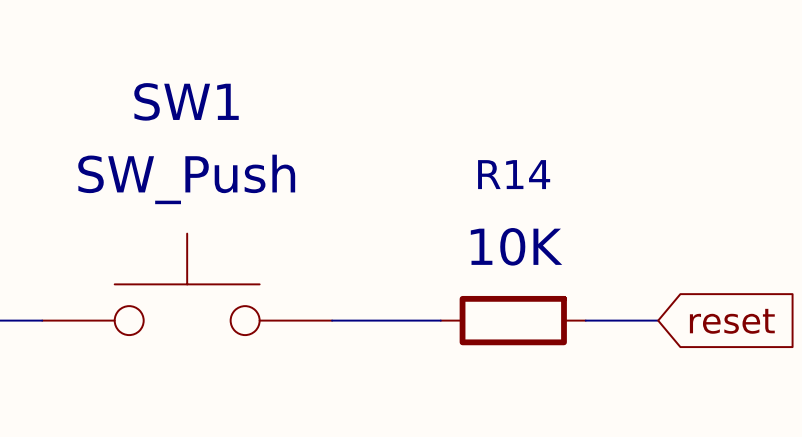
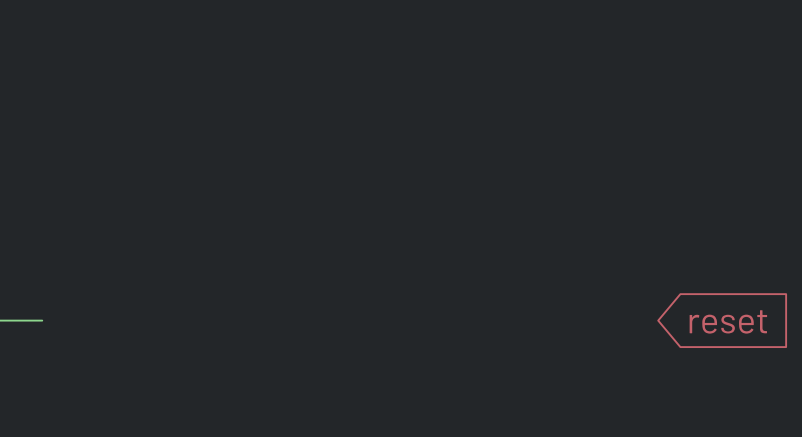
SW1: SW_Push (187, 284) -> none
wire: (332, 320) (440, 320) -> none
R14: 10K (513, 320) -> none
wire: (585, 320) (658, 320) -> none

